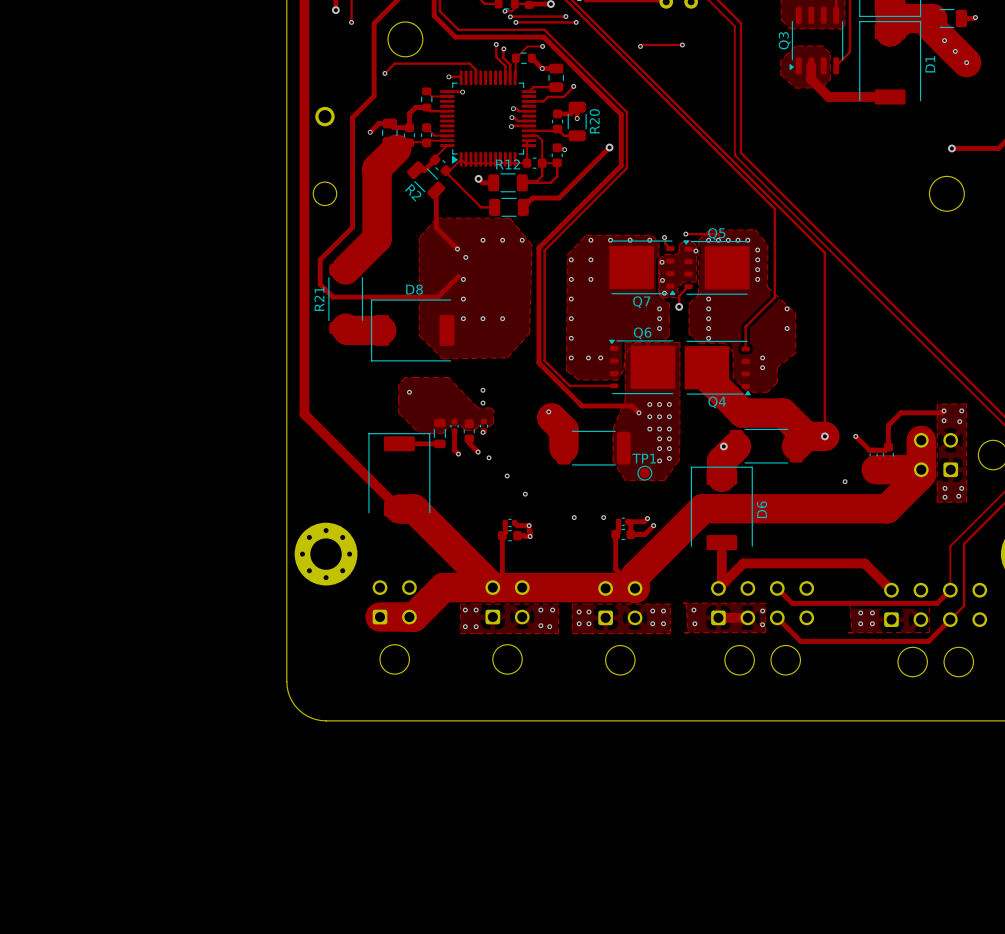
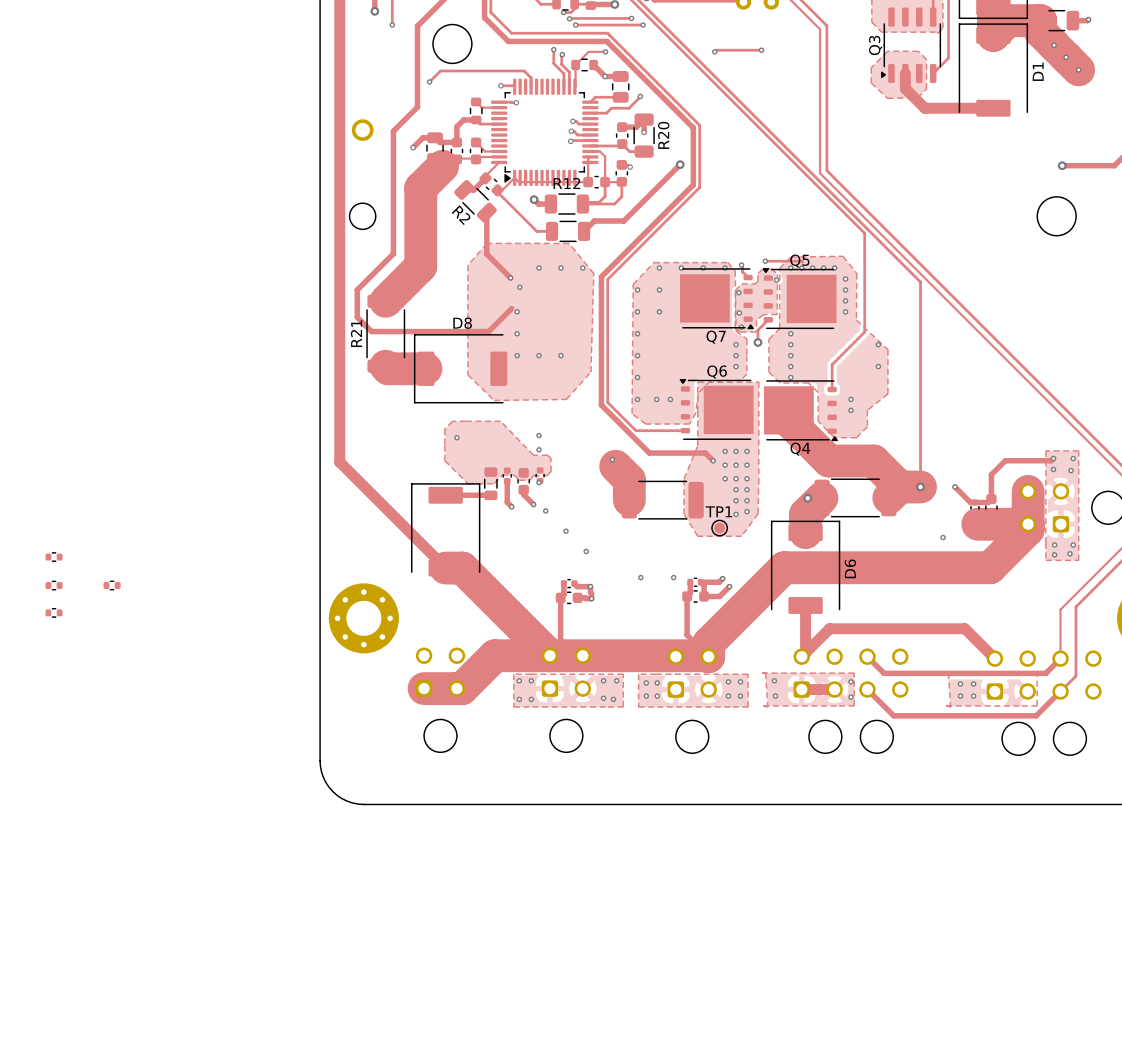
part: none -> (54, 557)
part: none -> (54, 585)
part: none -> (112, 585)
part: none -> (54, 612)

